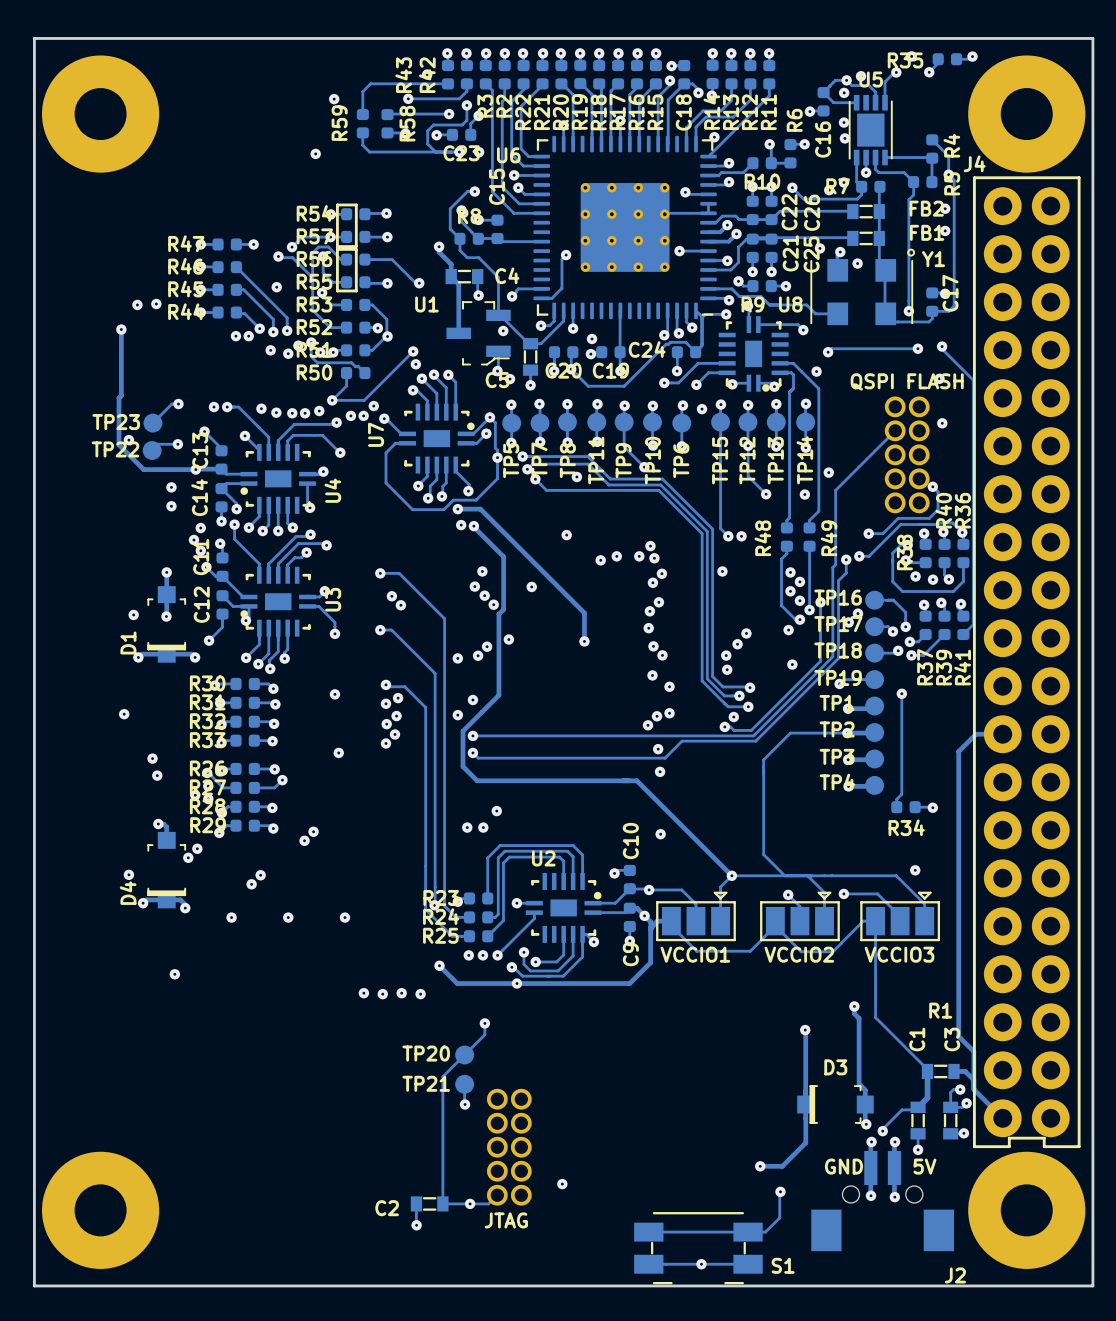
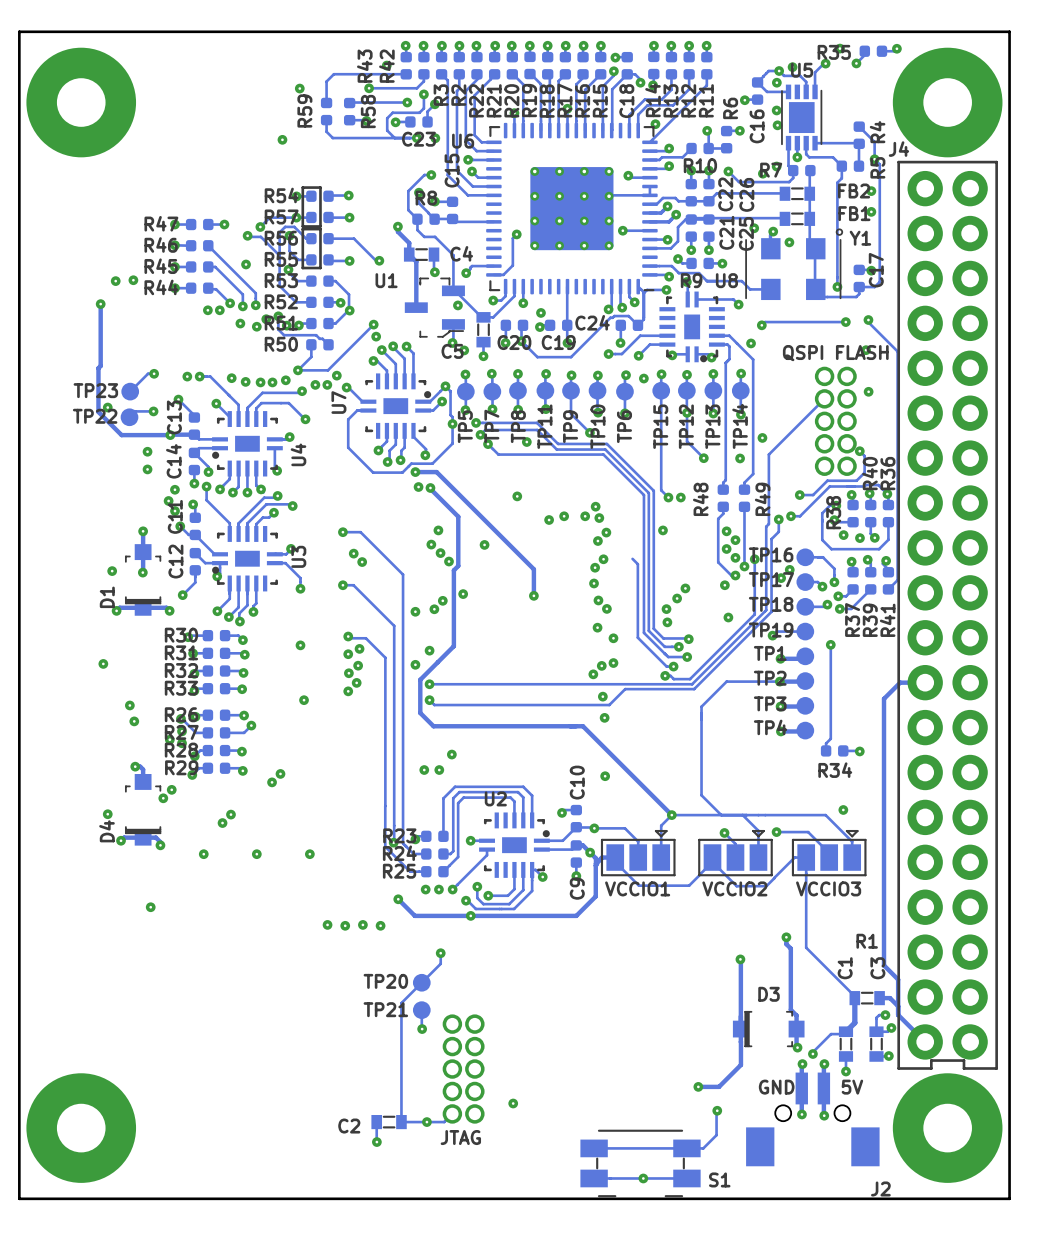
track: none -> (632, 558) (637, 564) (637, 637) (666, 666) (673, 666)

